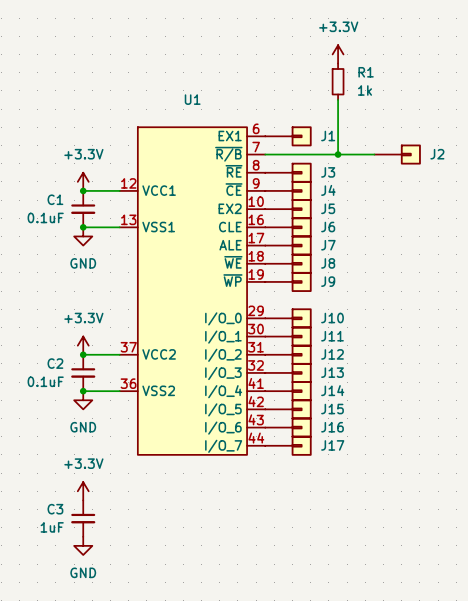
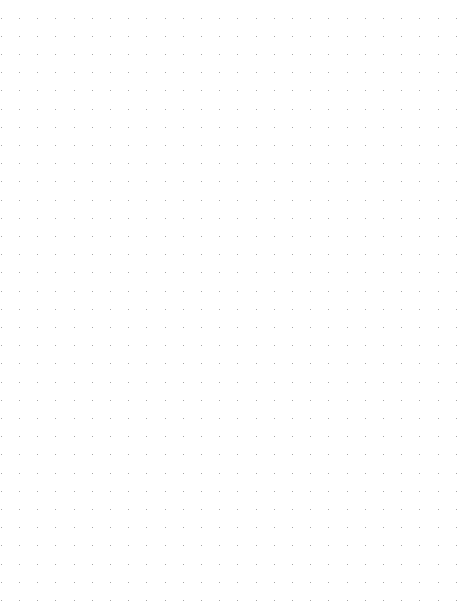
power symbol: +3.3V (338, 54) -> none
R1: 1k (338, 81) -> none
wire: (338, 99) (338, 154) -> none
J1: (288, 136) -> none
wire: (265, 154) (374, 154) -> none
junction: (338, 154) -> none
J2: (397, 154) -> none
J3: (288, 172) -> none
power symbol: +3.3V (83, 181) -> none
wire: (83, 190) (119, 190) -> none
junction: (83, 190) -> none
J4: (288, 190) -> none
C1: 0.1uF (83, 209) -> none
J5: (288, 209) -> none
wire: (83, 227) (119, 227) -> none
junction: (83, 227) -> none
J6: (288, 227) -> none
power symbol: GND (83, 236) -> none
J7: (288, 245) -> none
J8: (288, 263) -> none
J9: (288, 281) -> none
U1: (192, 291) -> none
J10: (288, 318) -> none
J11: (288, 336) -> none
power symbol: +3.3V (83, 345) -> none
wire: (83, 354) (119, 354) -> none
junction: (83, 354) -> none
J12: (288, 354) -> none
C2: 0.1uF (83, 372) -> none
J13: (288, 372) -> none
wire: (83, 391) (119, 391) -> none
junction: (83, 391) -> none
J14: (288, 391) -> none
power symbol: GND (83, 400) -> none
J15: (288, 409) -> none
J16: (288, 427) -> none
J17: (288, 445) -> none
power symbol: +3.3V (83, 491) -> none
C3: 1uF (83, 518) -> none
power symbol: GND (83, 545) -> none

